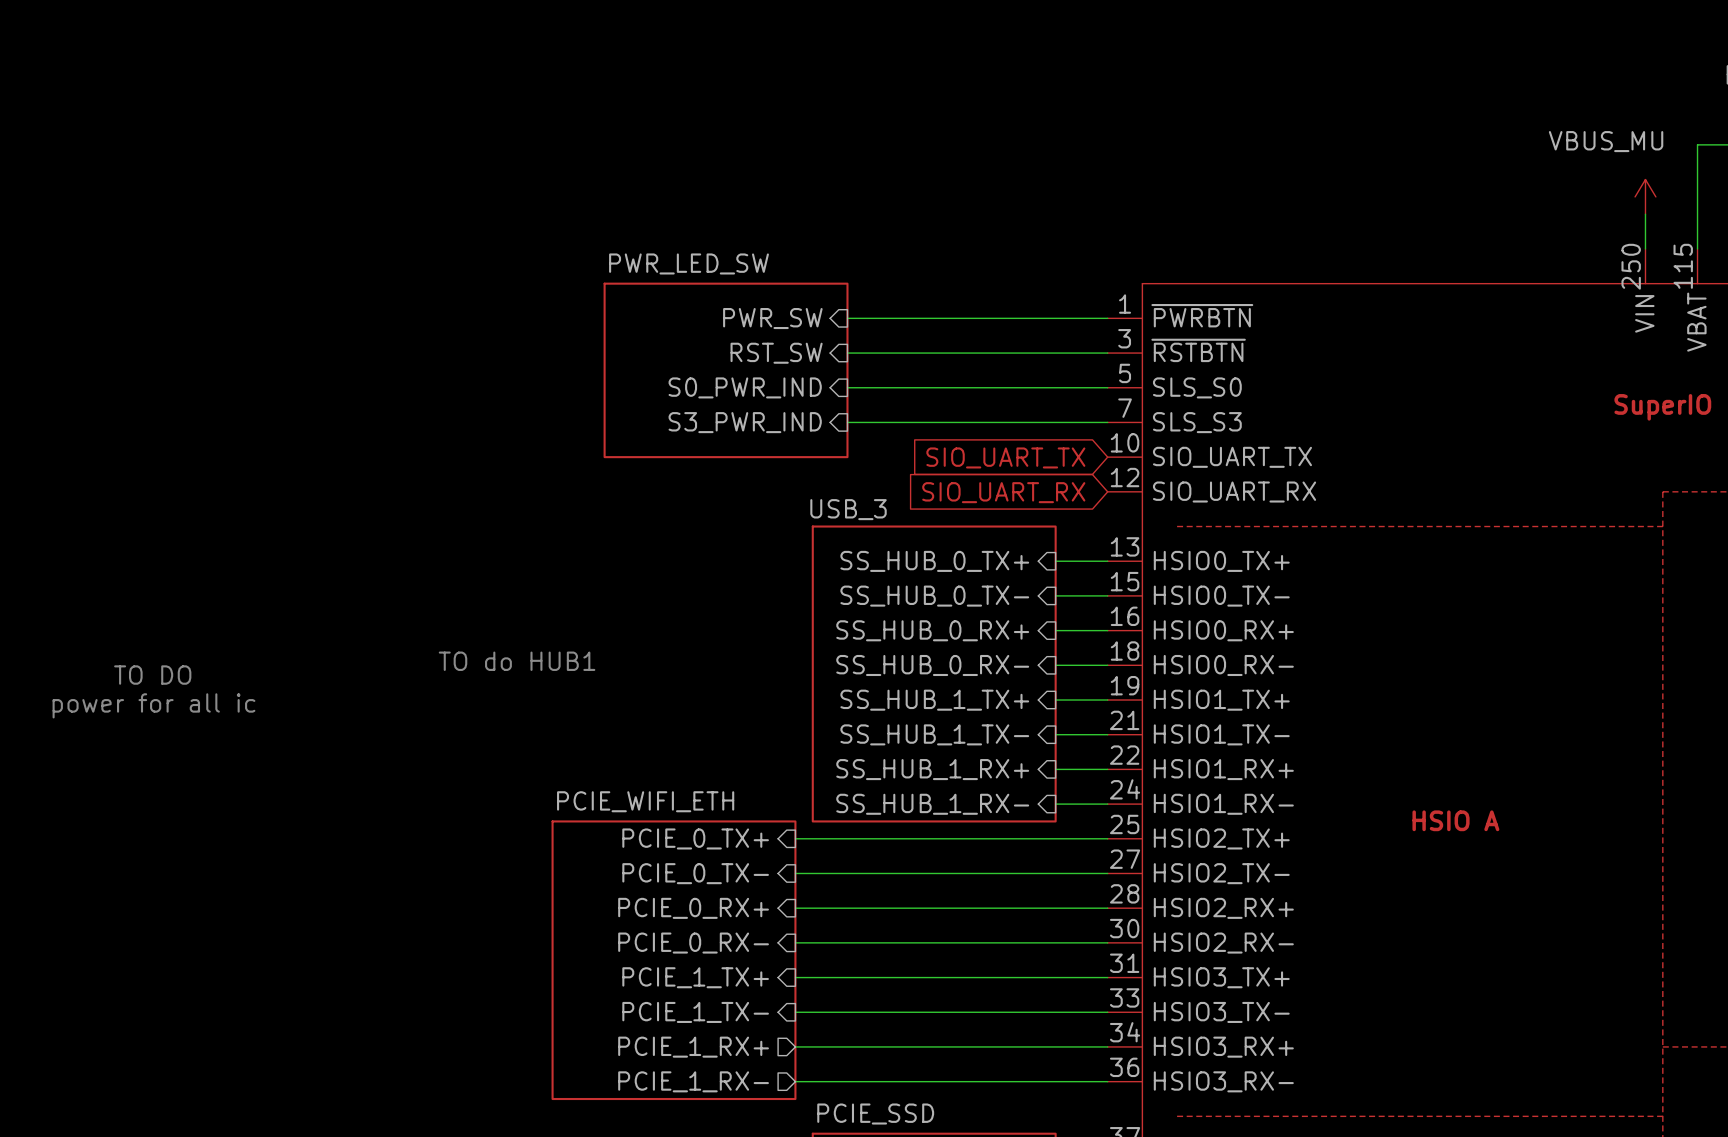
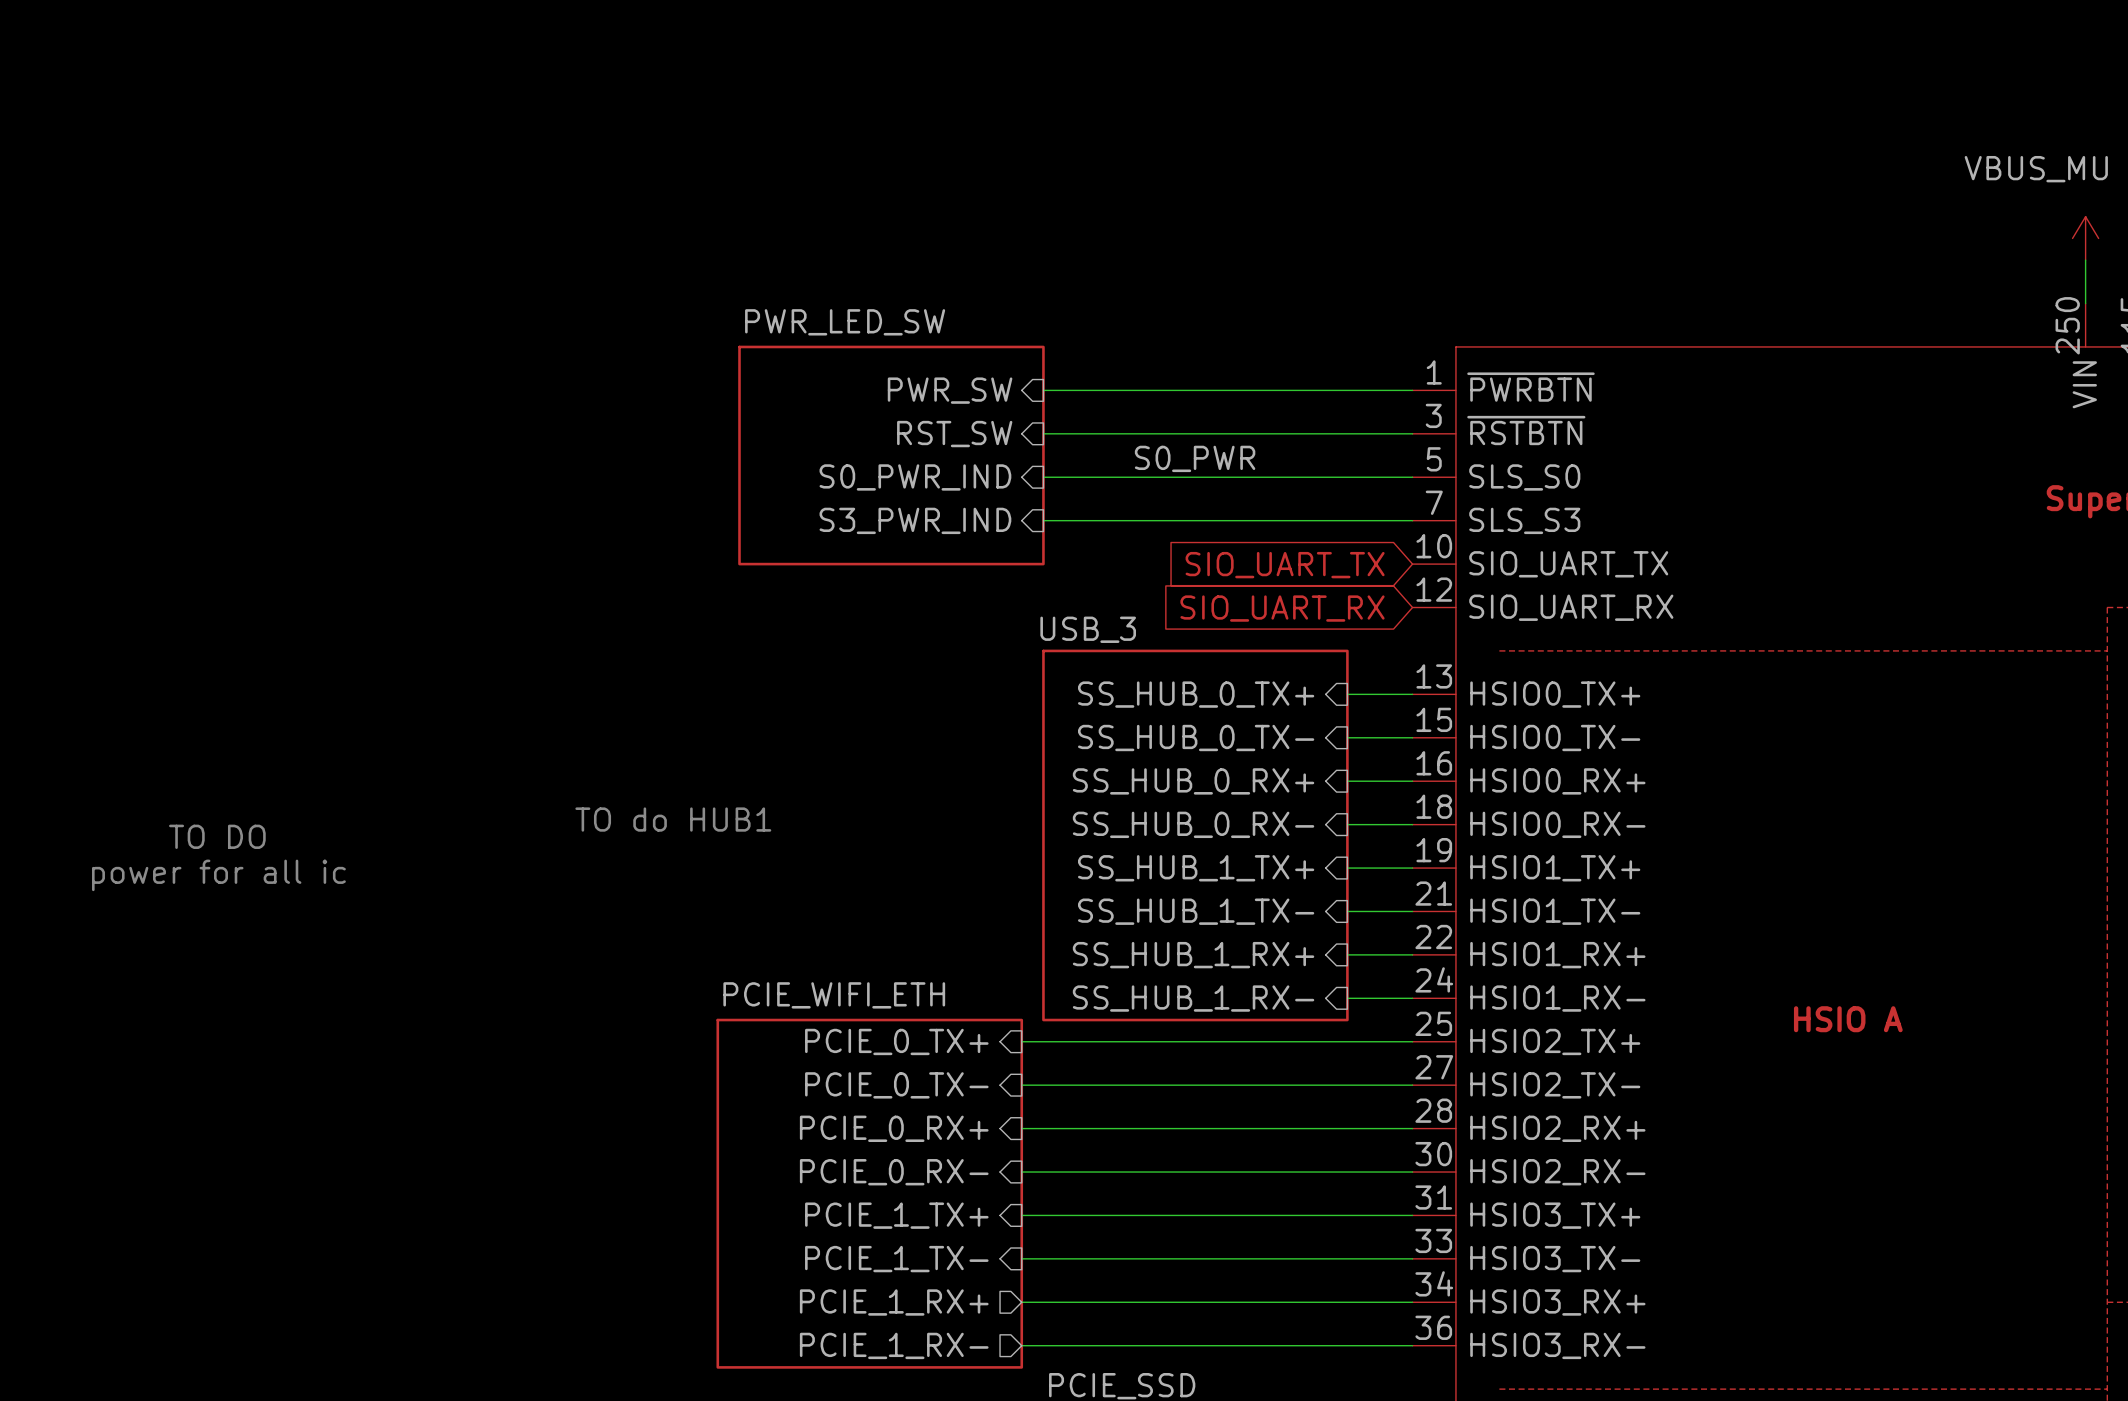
sheet pin position: PWR_SW (772, 318) -> PWR_SW (950, 390)
wire: none -> (1043, 390) (1086, 390)
sheet pin position: RST_SW (776, 353) -> RST_SW (954, 434)
wire: none -> (1043, 433) (1086, 433)
sheet PWR_LED_SW position: (726, 370) -> (891, 455)
label: none -> S0_PWR (1195, 458)
sheet pin position: S0_PWR_IND (745, 387) -> S0_PWR_IND (915, 477)
wire: none -> (1043, 477) (1086, 477)
sheet pin position: S3_PWR_IND (745, 422) -> S3_PWR_IND (915, 520)
wire: none -> (1043, 520) (1086, 520)

